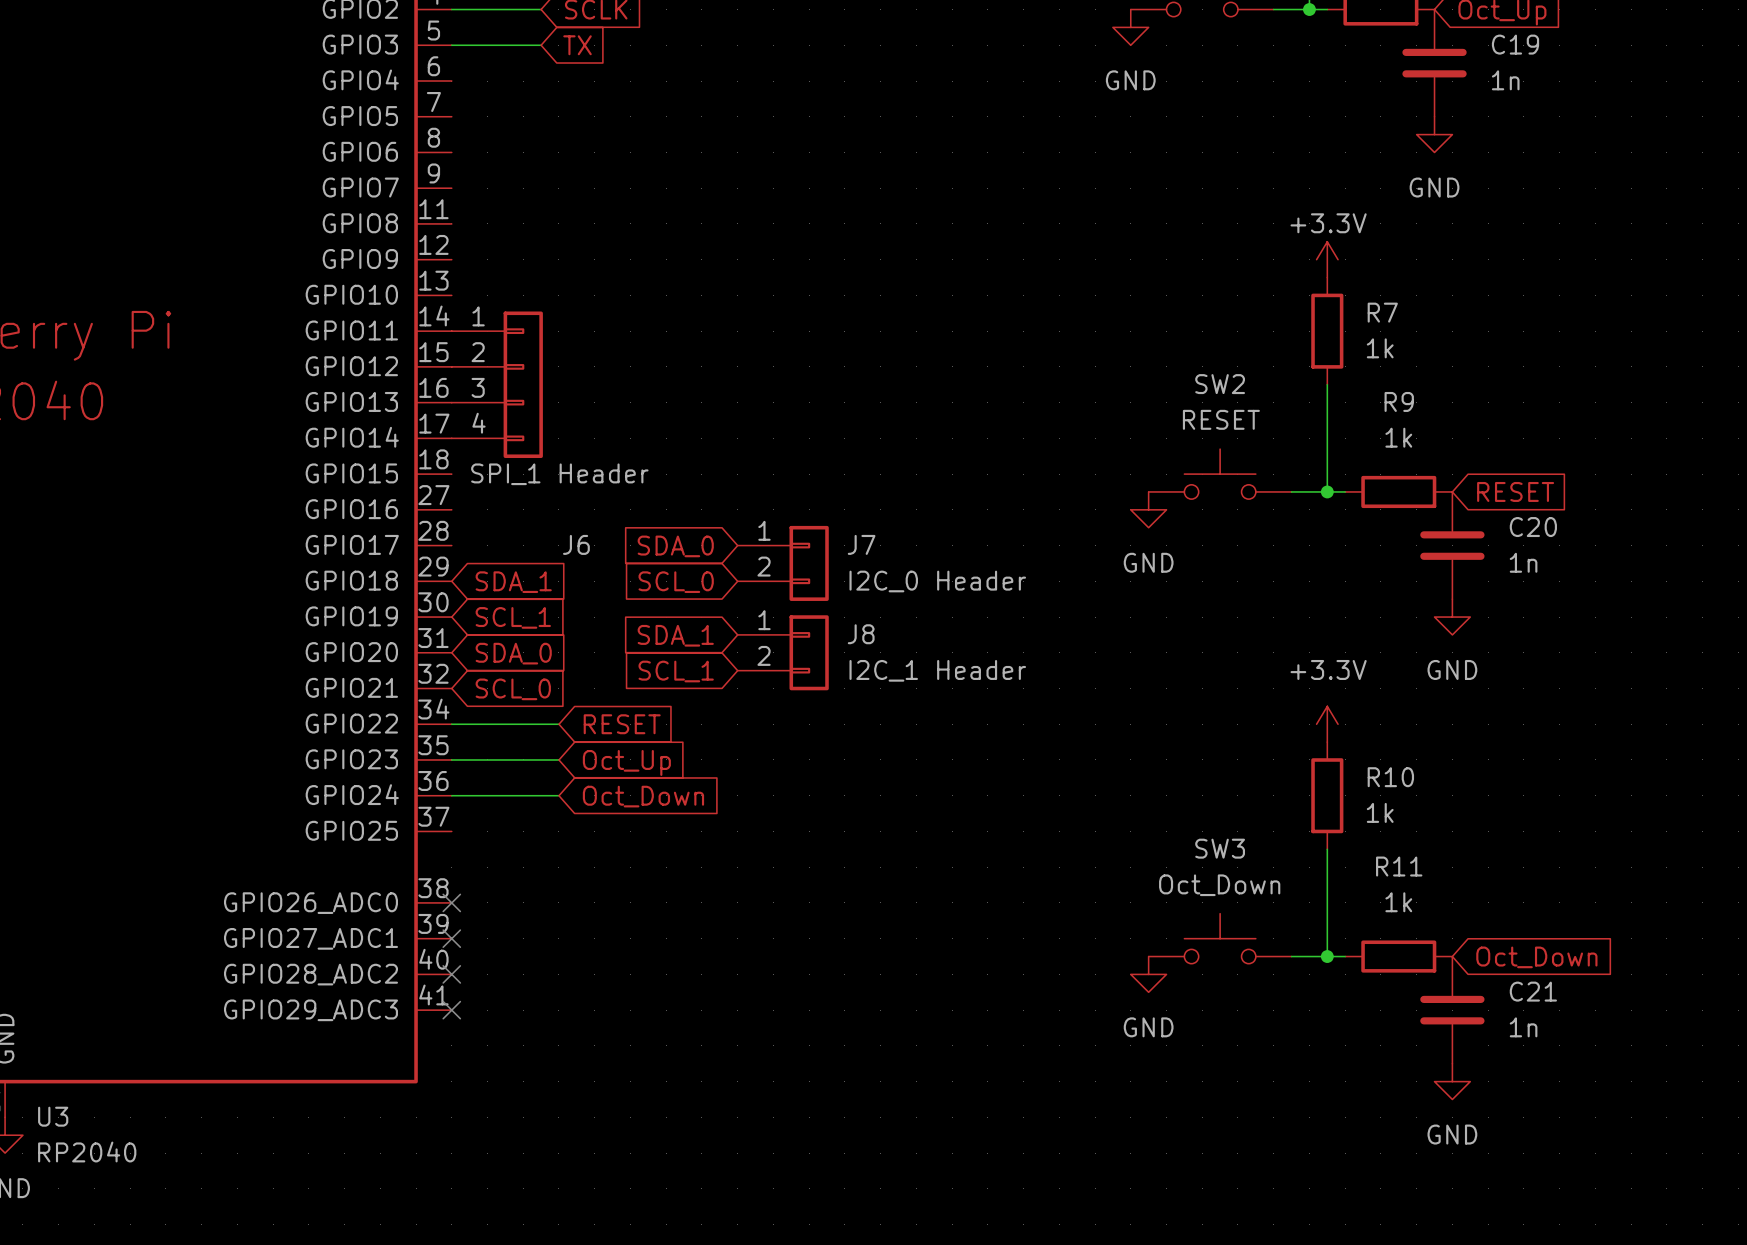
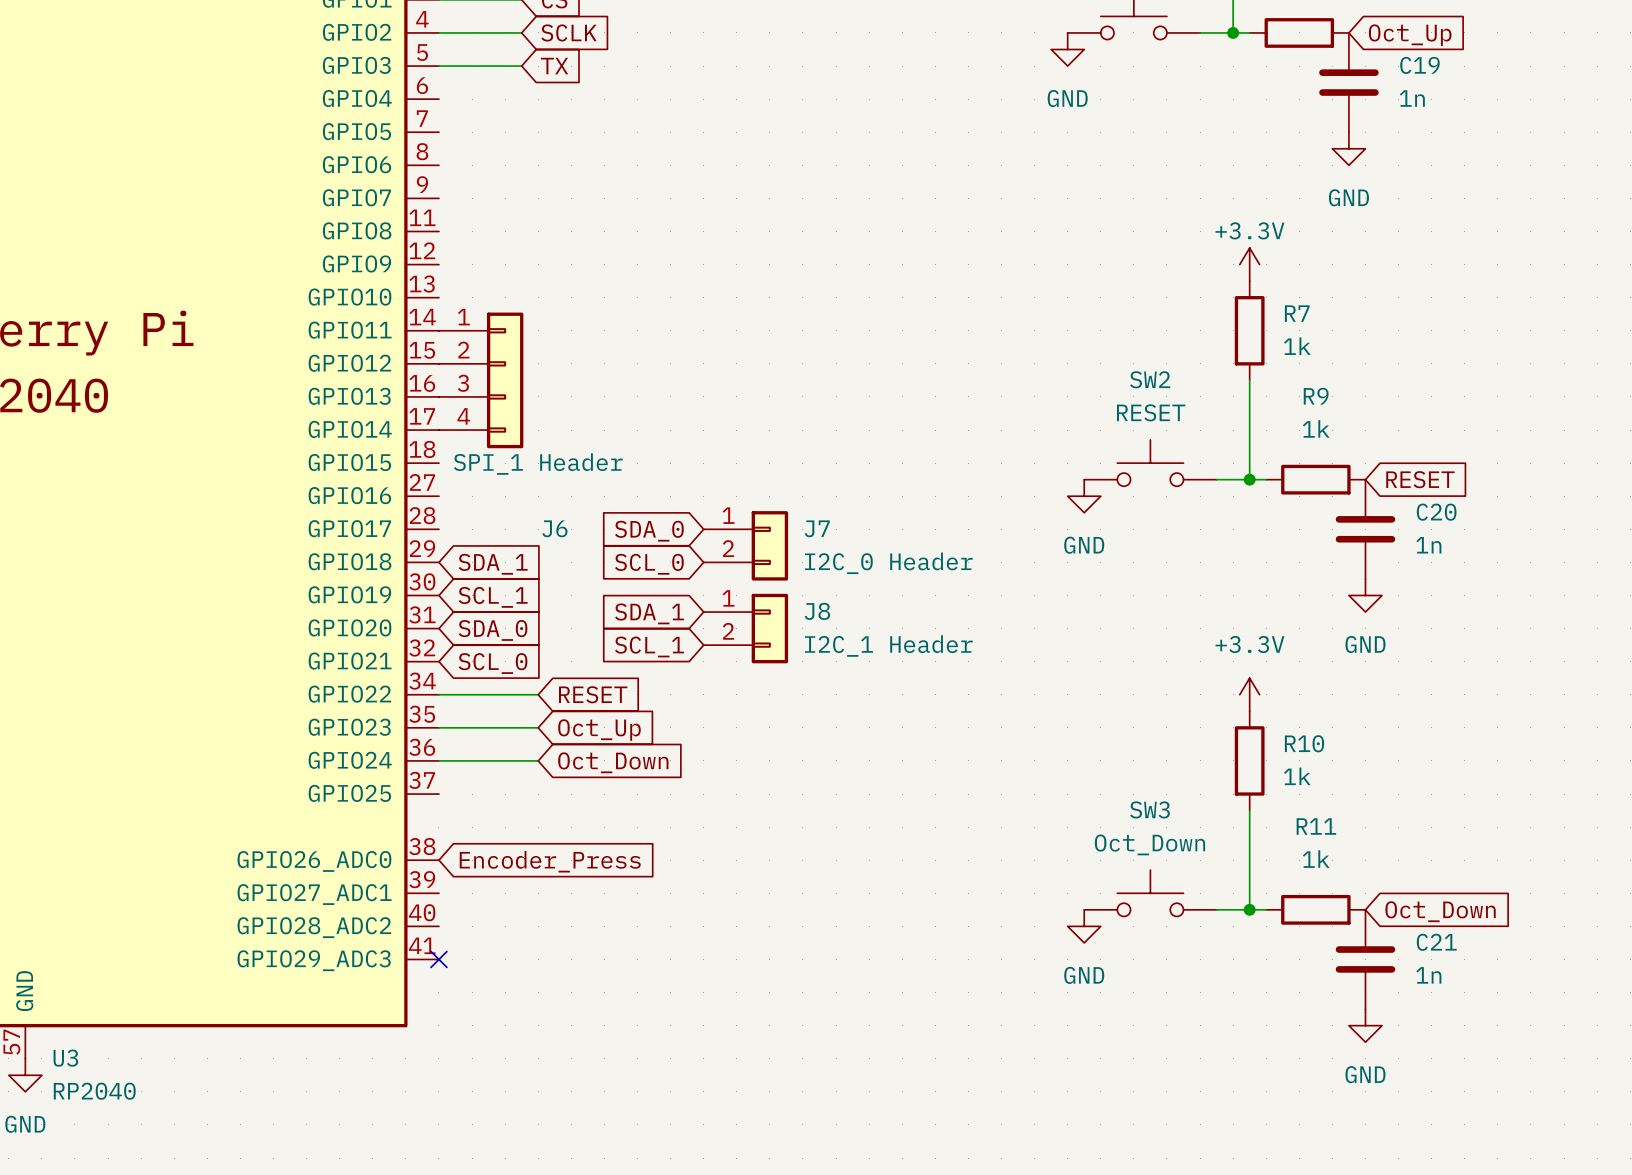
no-connect mark: (451, 902) -> none
global label: none -> Encoder_Press (550, 861)
no-connect mark: (451, 938) -> none
no-connect mark: (451, 974) -> none

